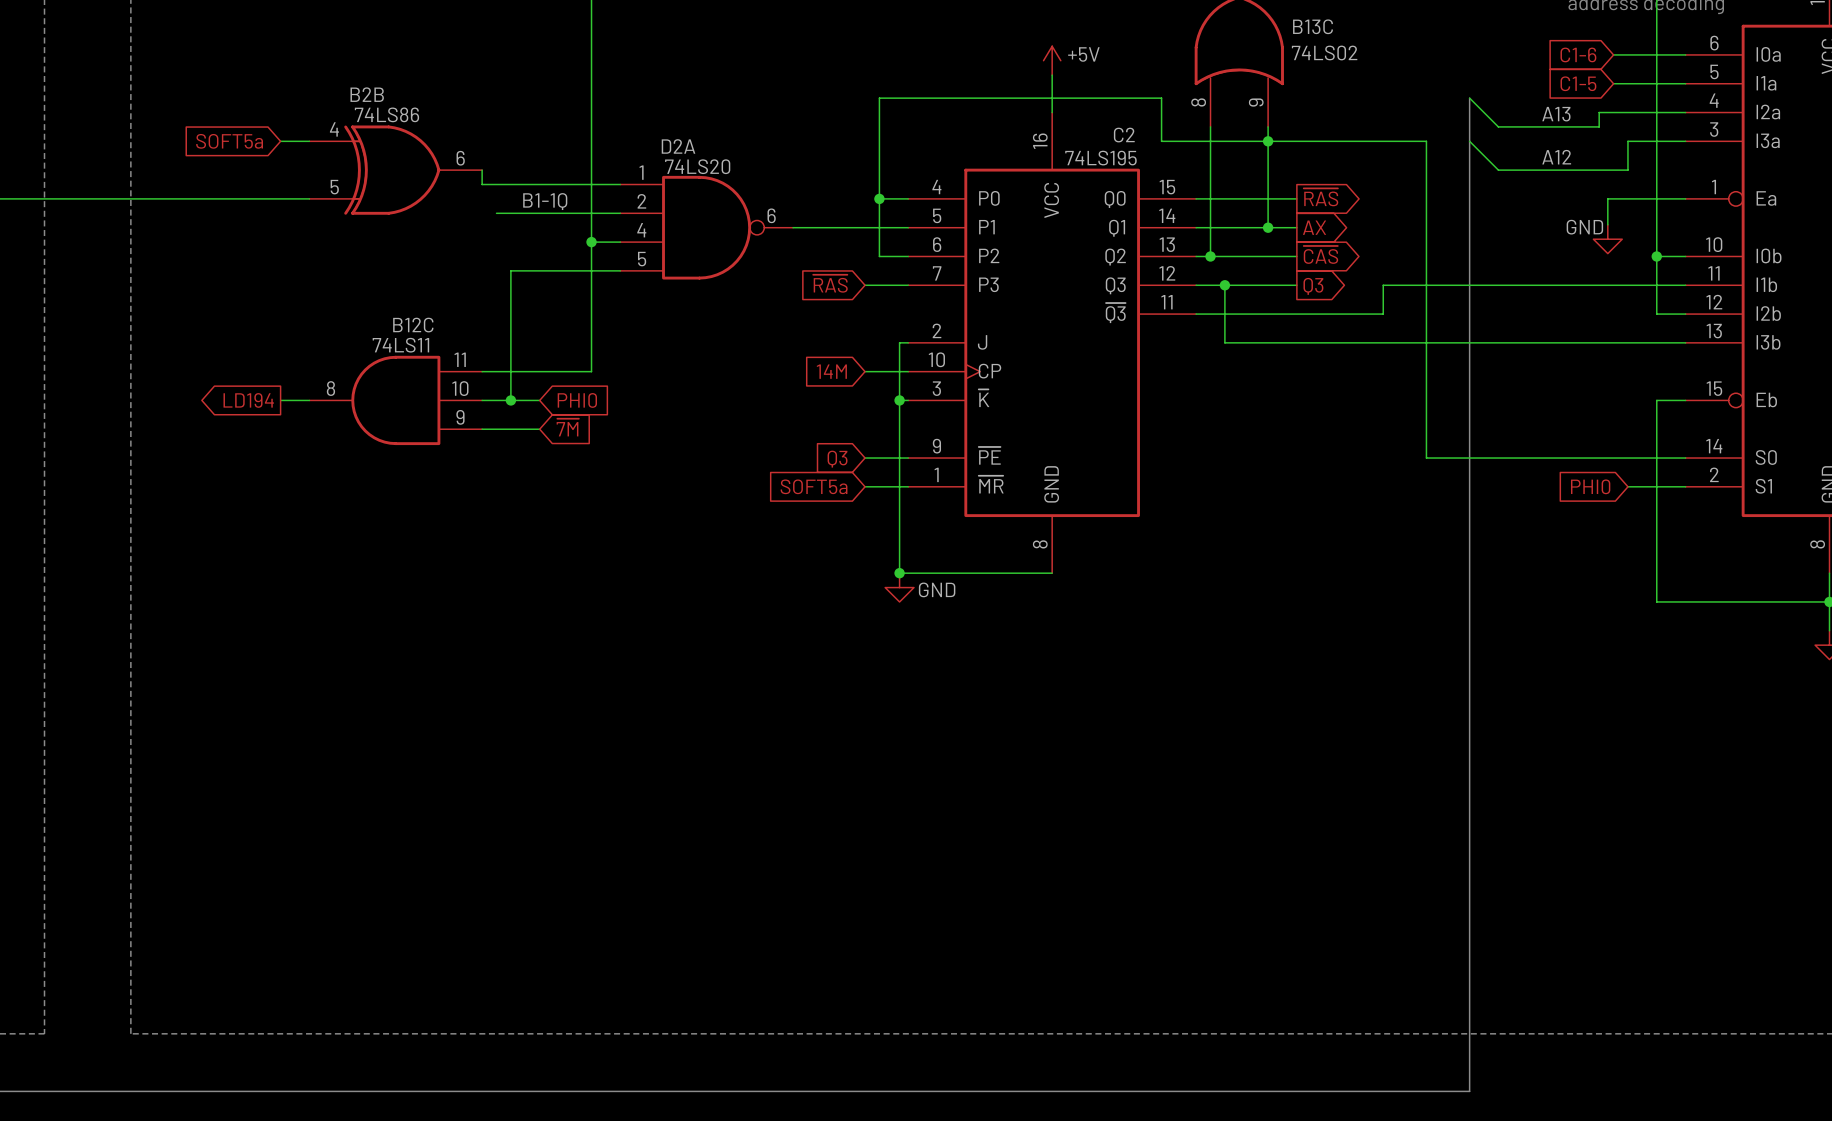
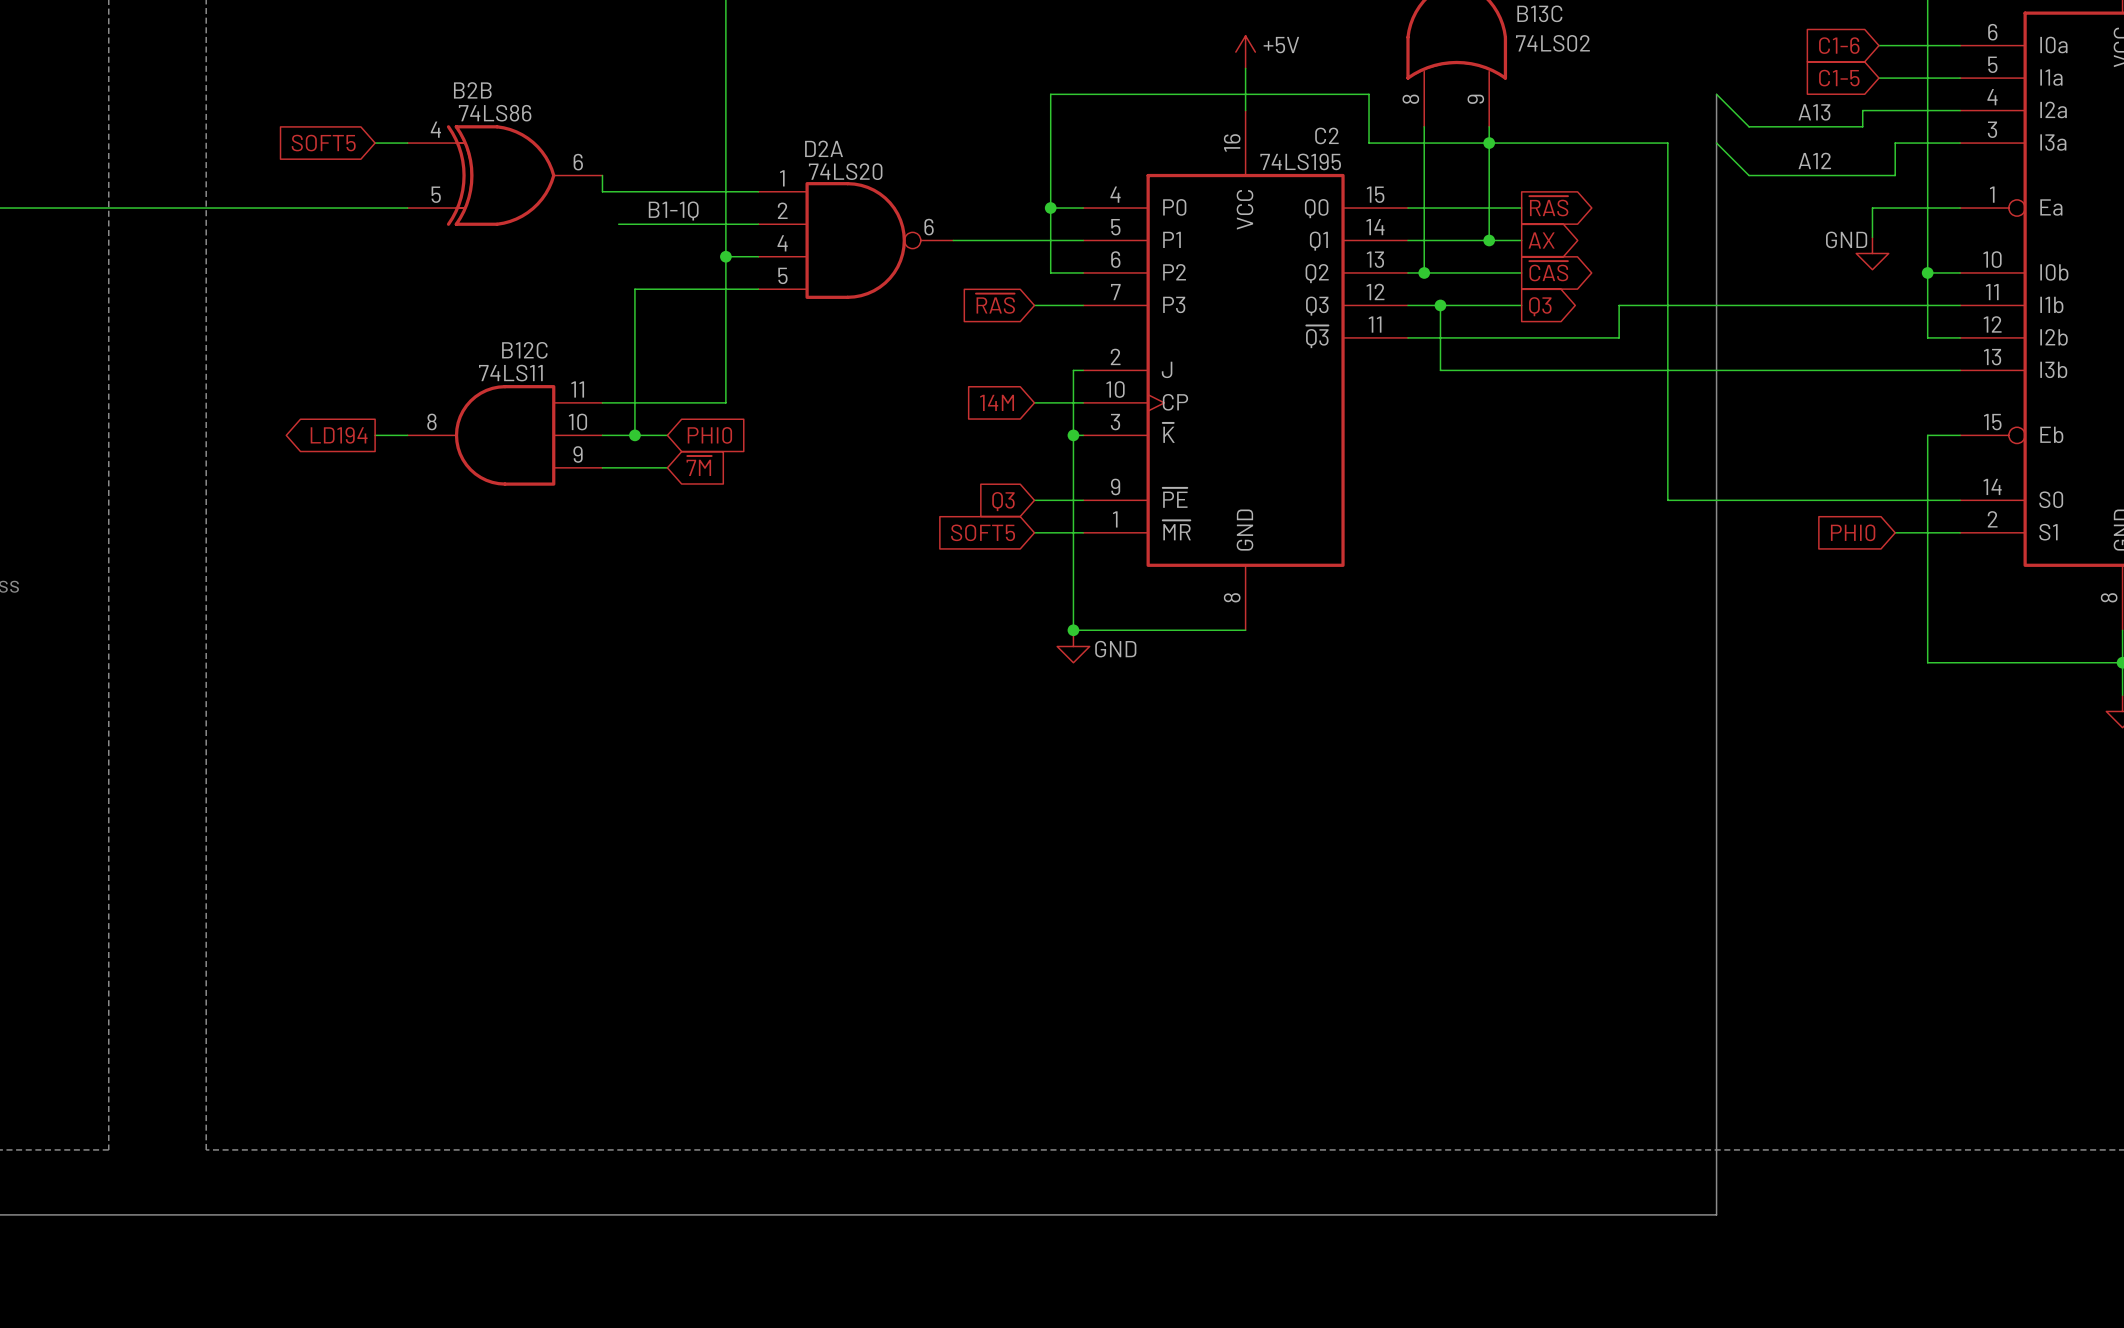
global label: SOFT5a (229, 141) -> SOFT5 (323, 143)
global label: SOFT5a (814, 486) -> SOFT5 (983, 532)

